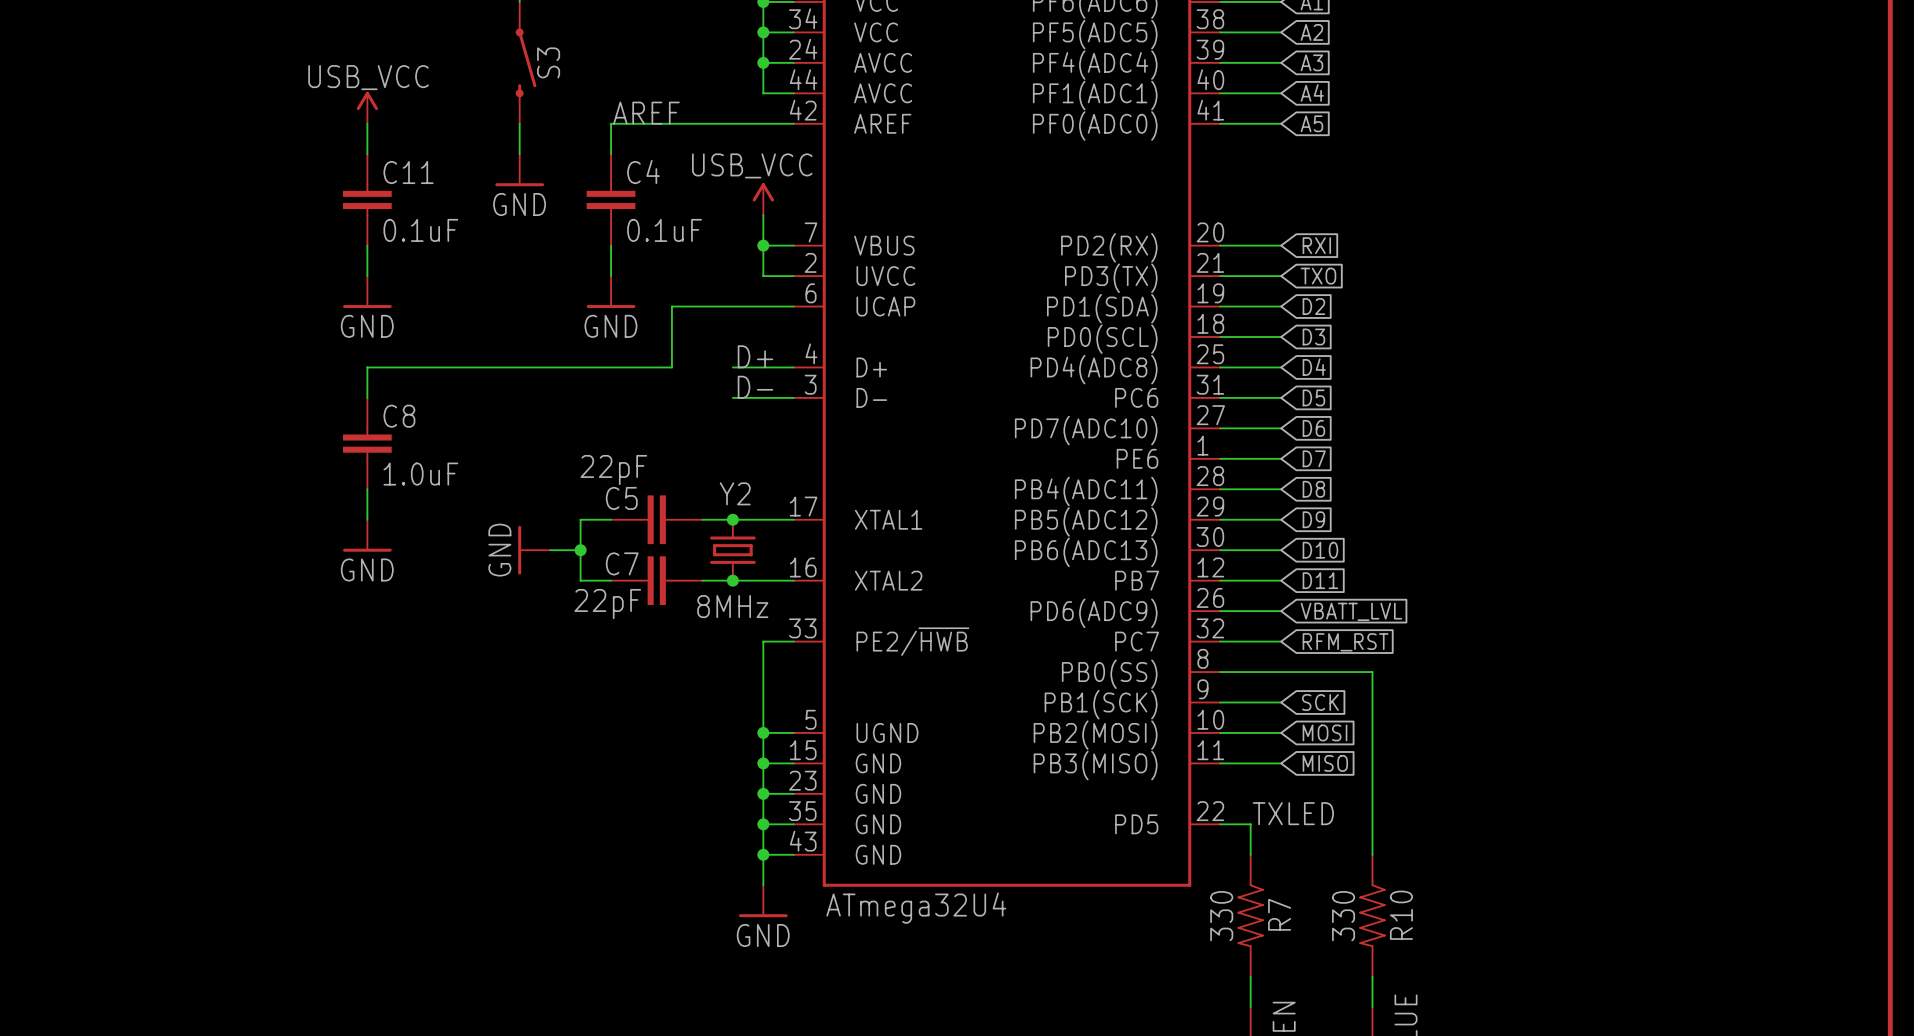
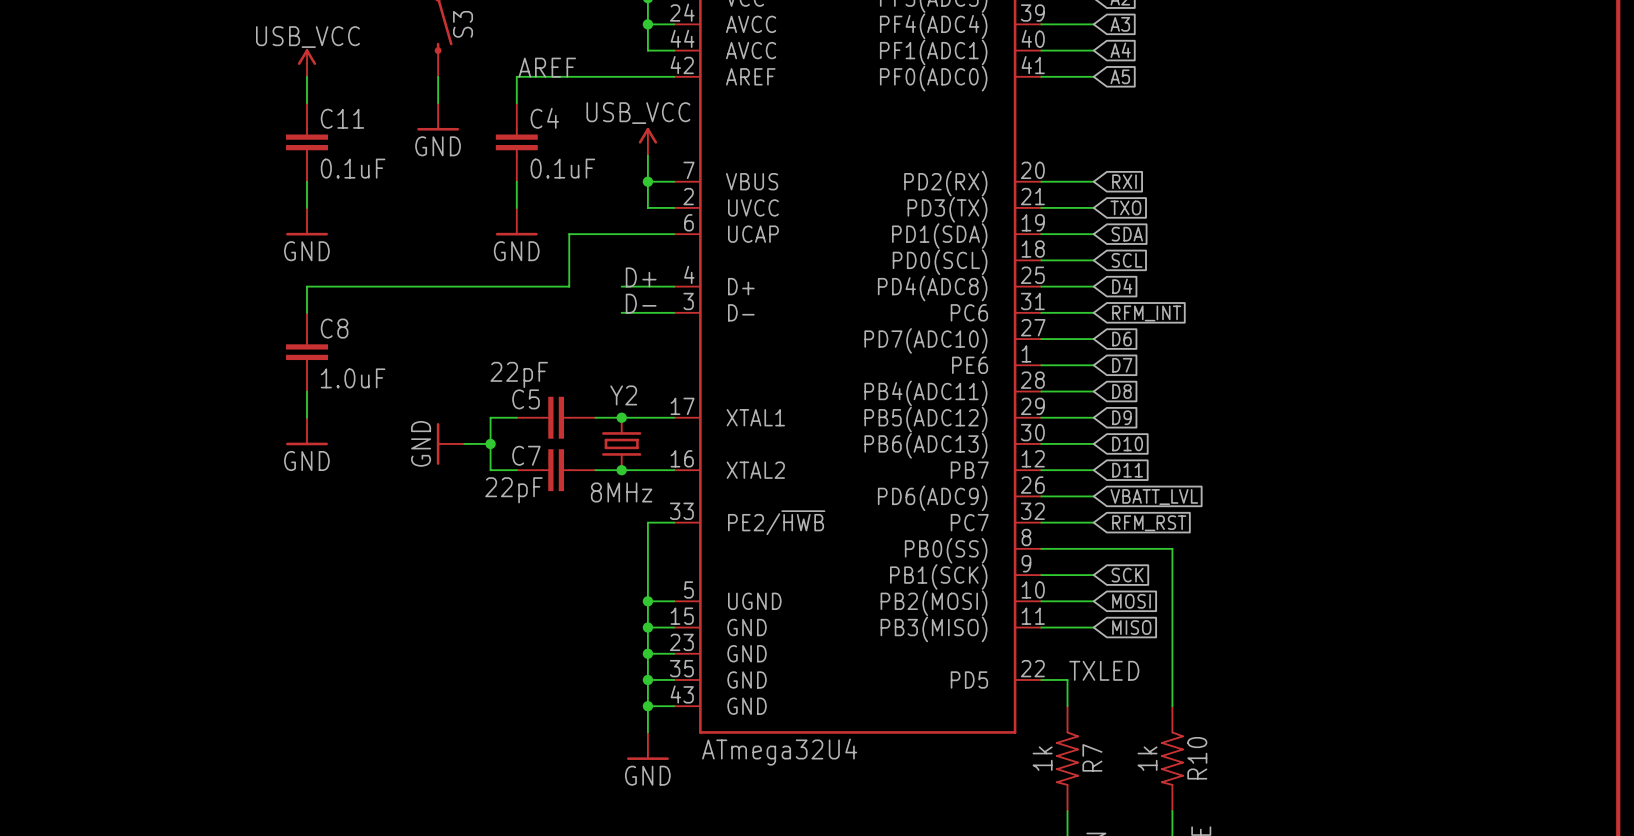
global label: D2 (1313, 306) -> SDA (1127, 234)
global label: D3 (1313, 337) -> SCL (1127, 260)
global label: D5 (1313, 397) -> RFM_INT (1146, 313)
R7 value: 330 (1221, 916) -> 1k (1042, 758)
R10 value: 330 (1343, 916) -> 1k (1147, 758)

